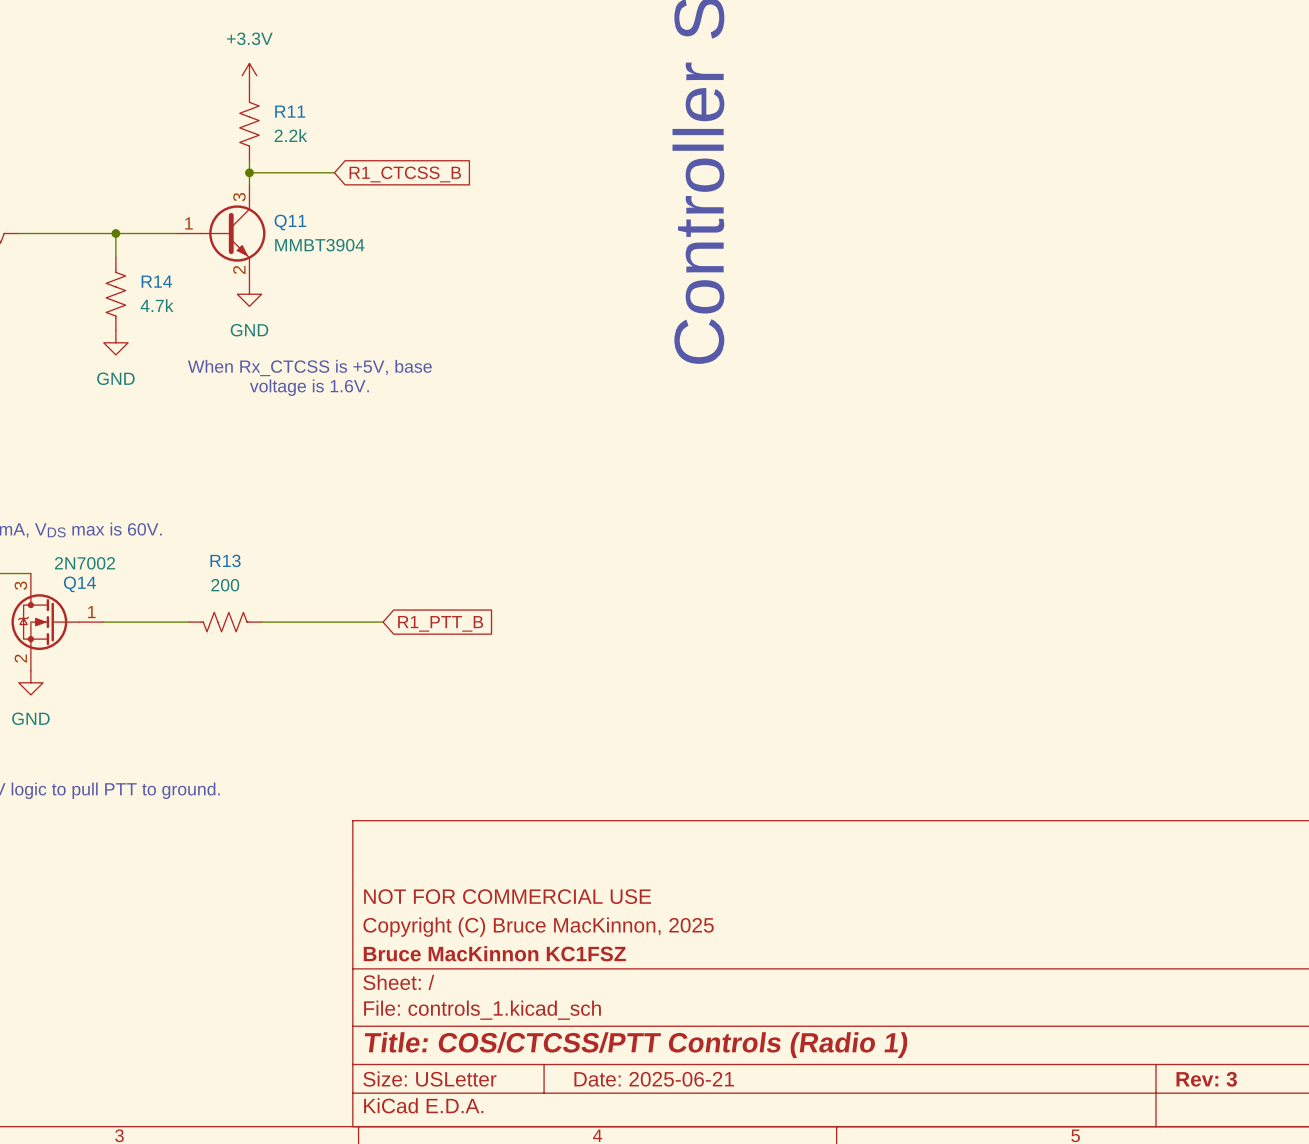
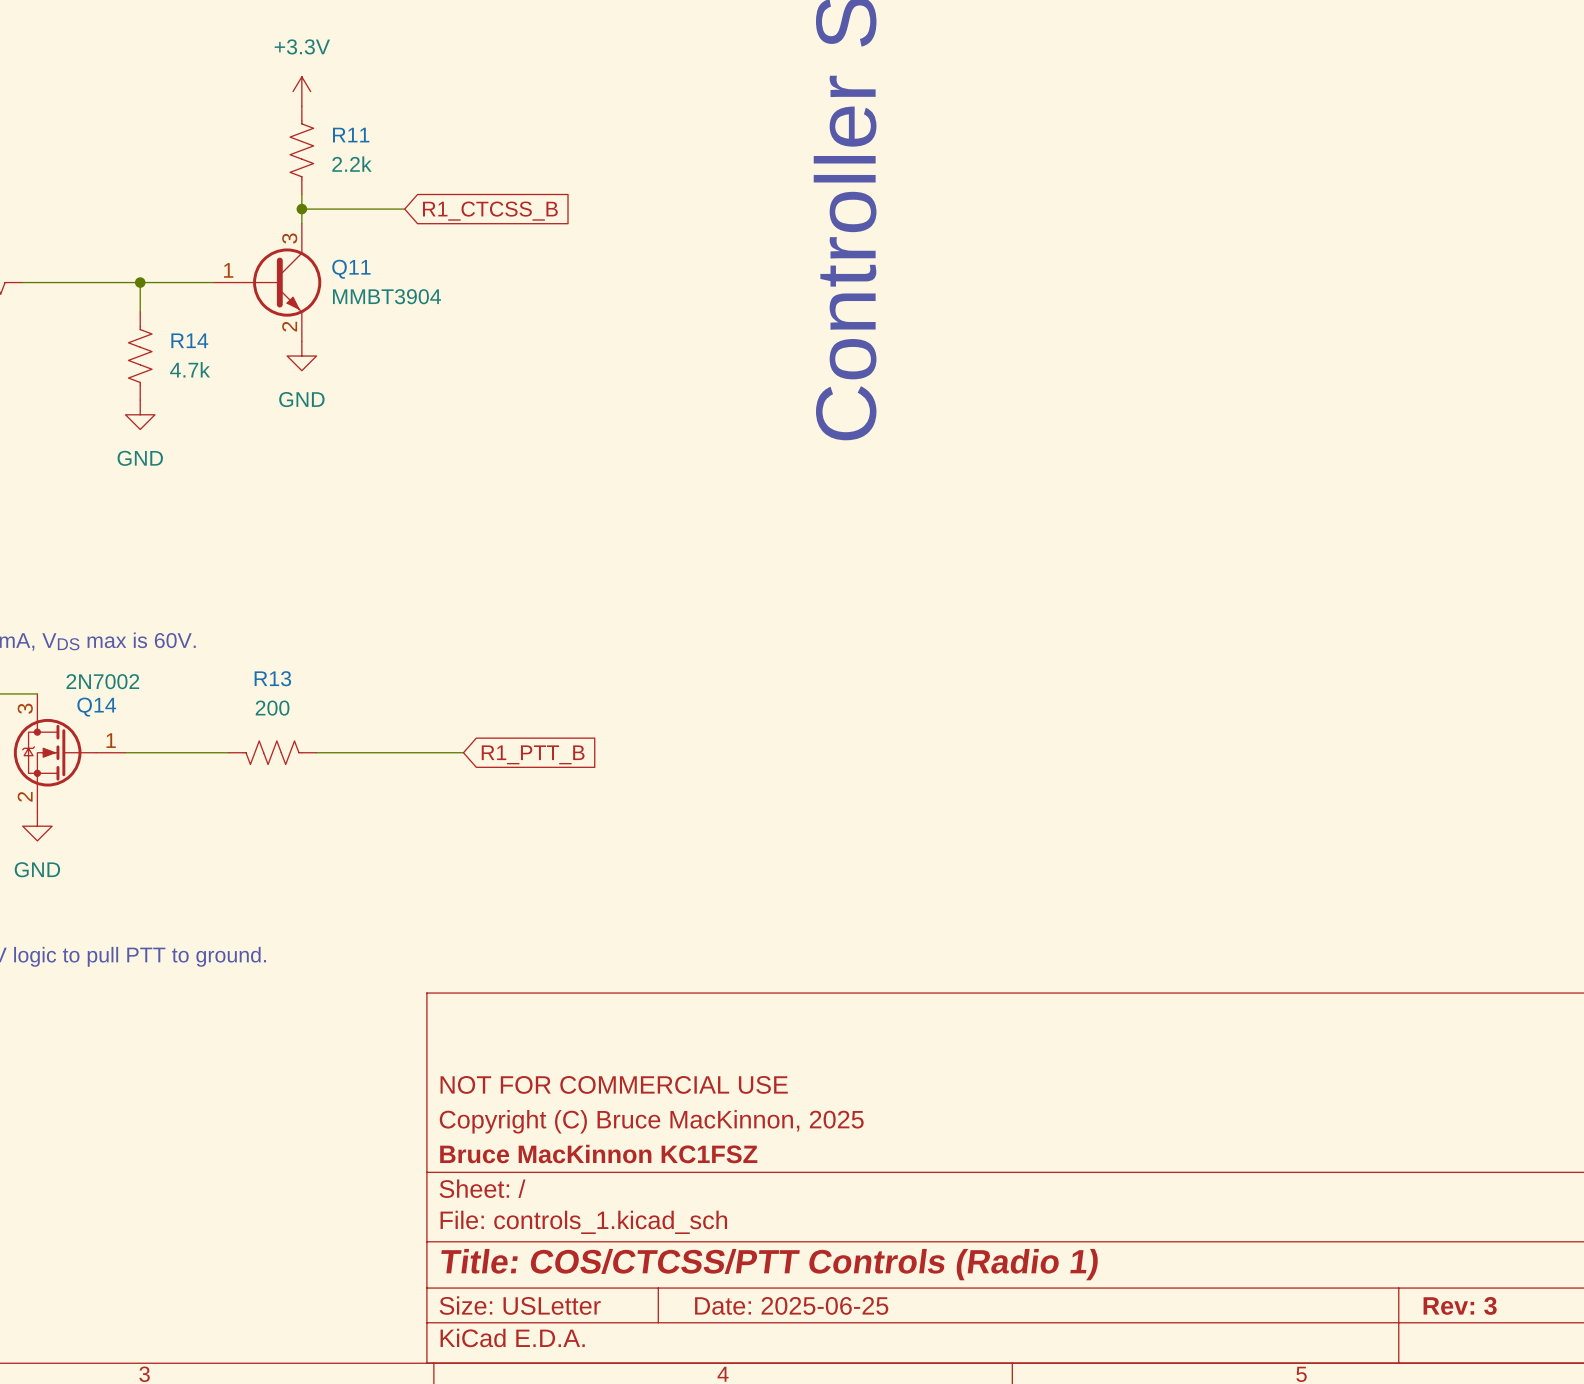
text: When Rx_CTCSS is +5V, base (309, 368) -> none
text: voltage is 1.6V. (309, 387) -> none
title block: Date: 2025-06-21 (654, 1079) -> Date: 2025-06-25 (791, 1305)

